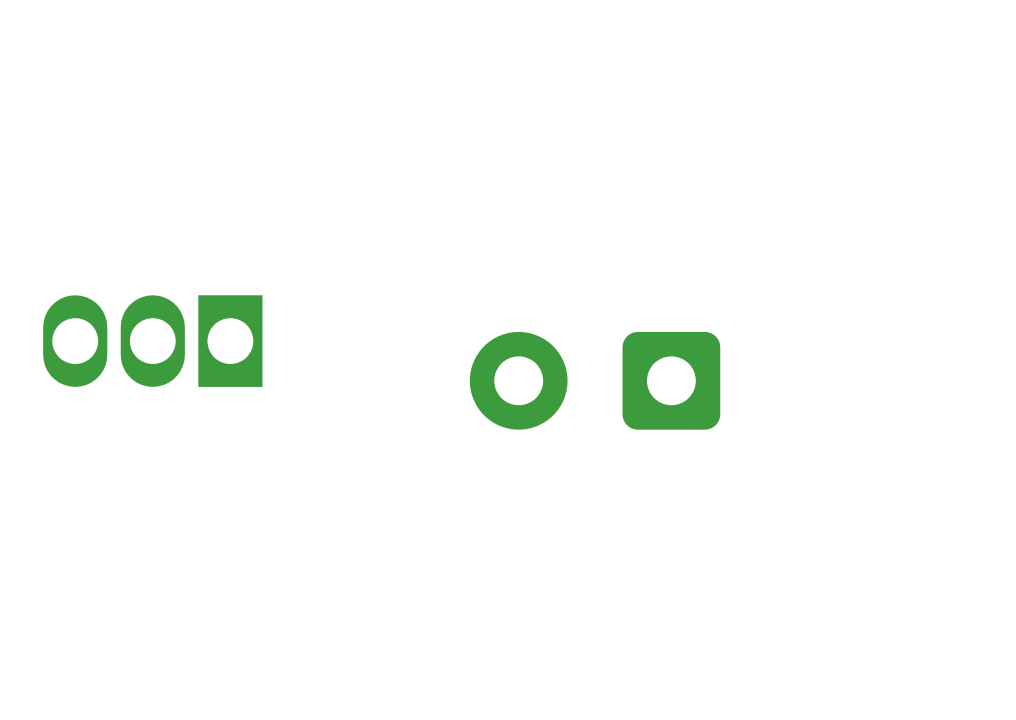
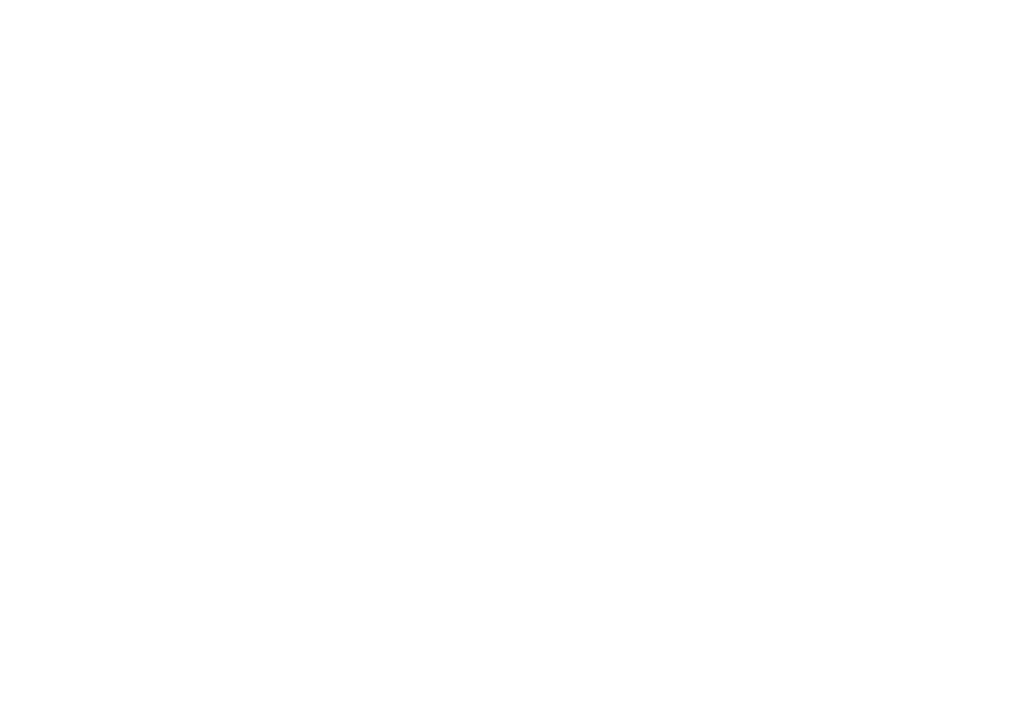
part: (152, 341) -> none
part: (595, 380) -> none

